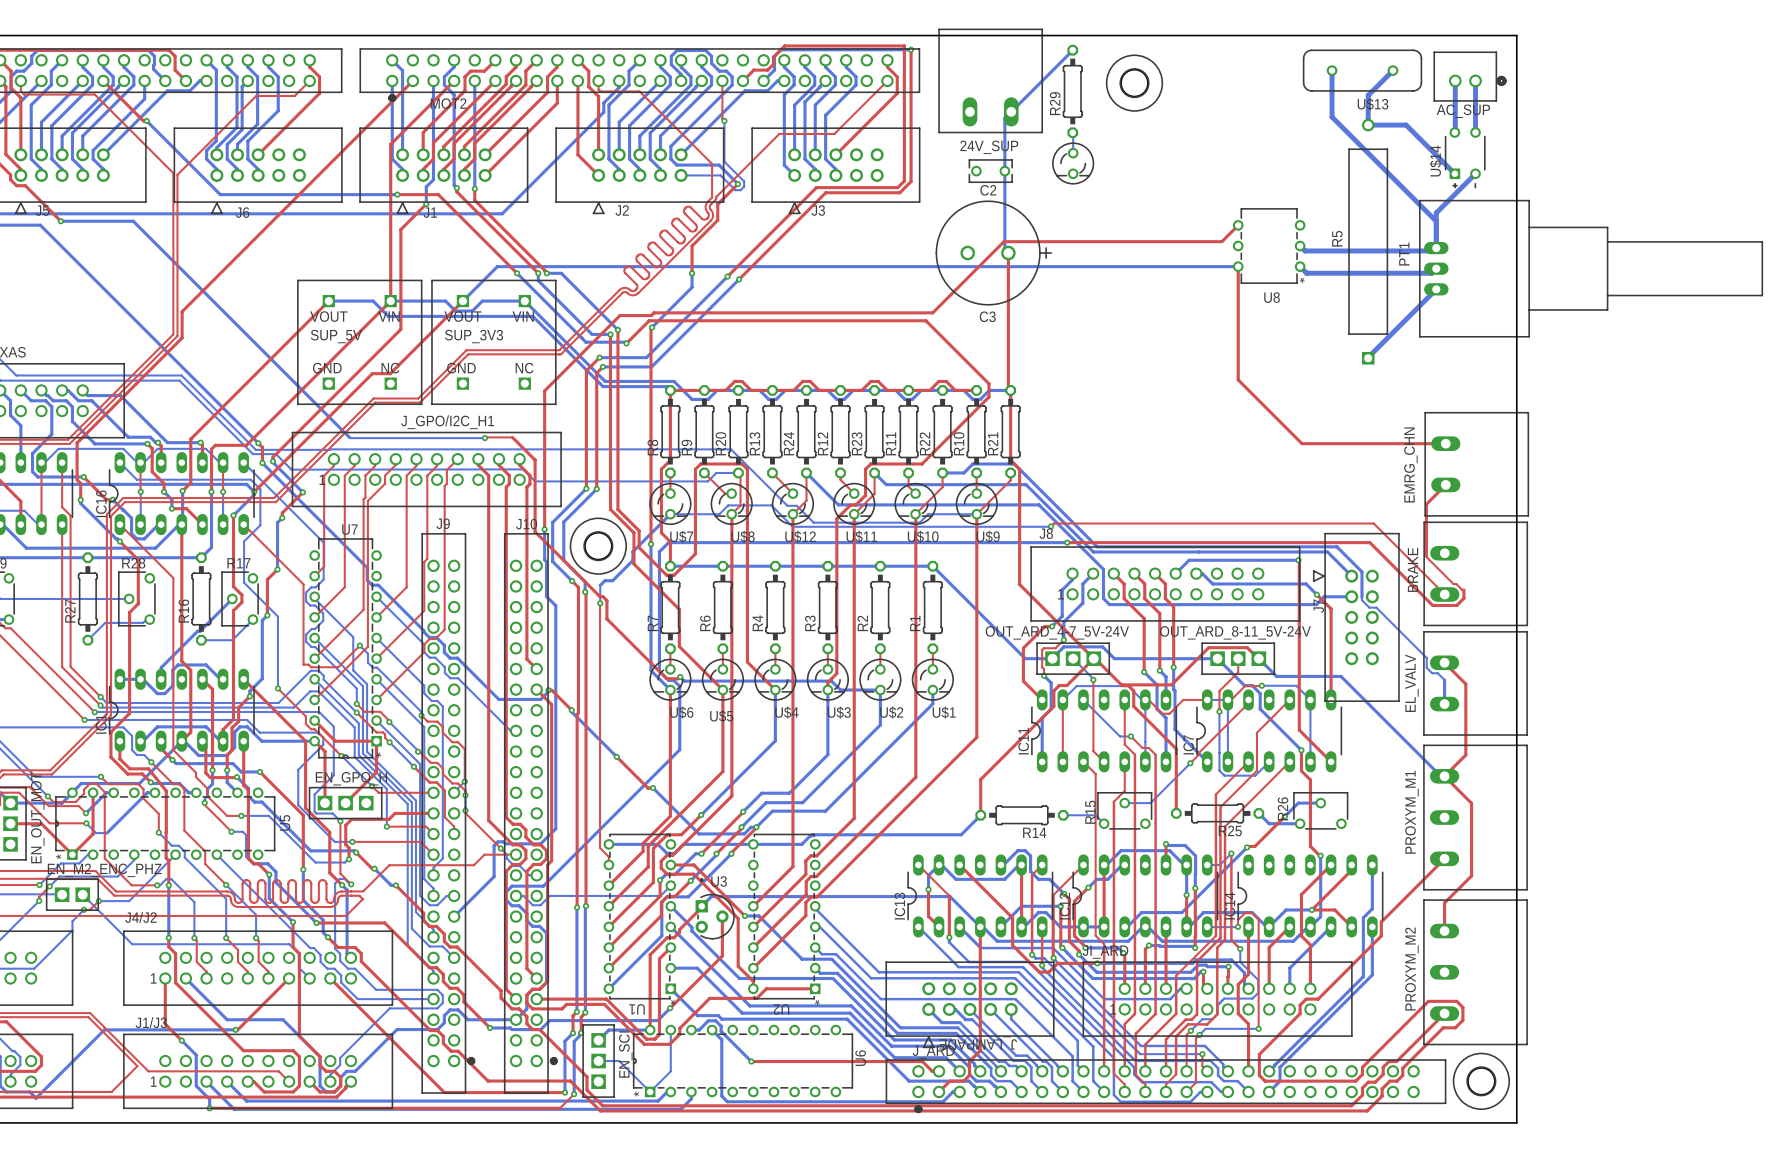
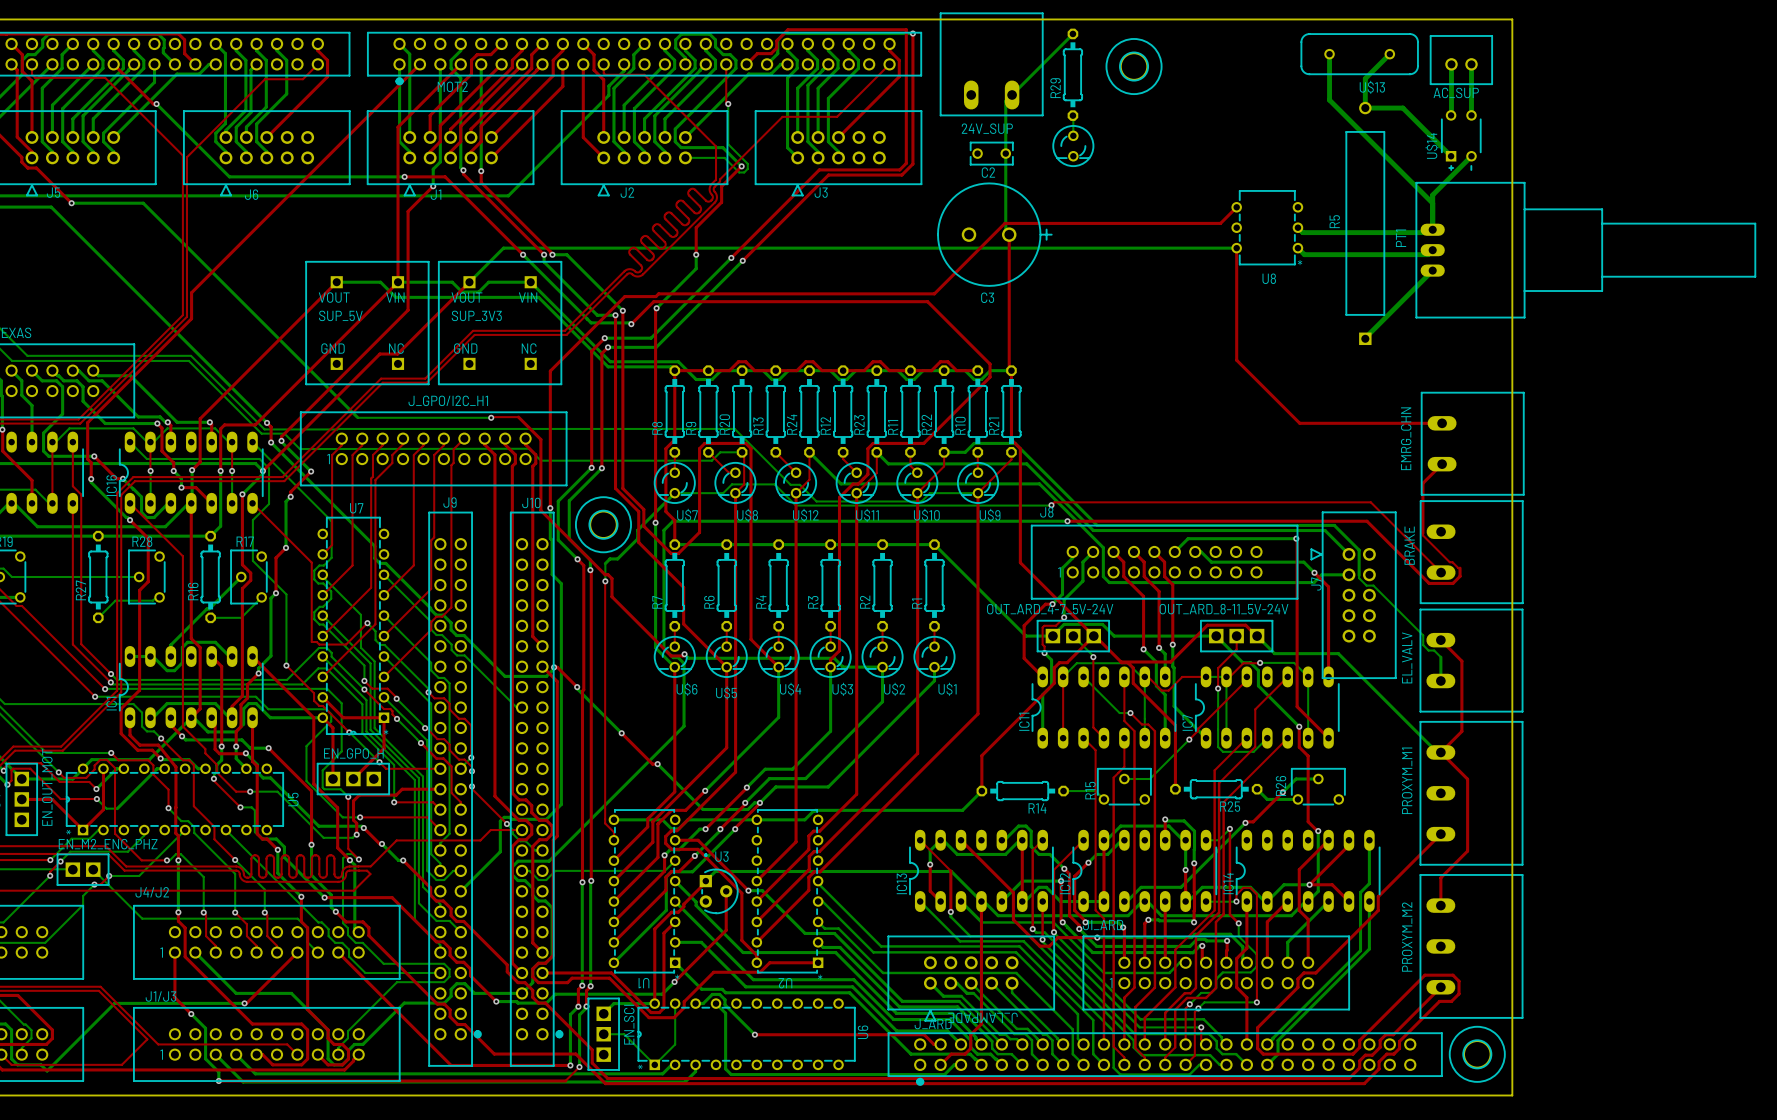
AC_SUP footprint: [1433, 51, 1507, 102] -> [1430, 35, 1493, 85]

